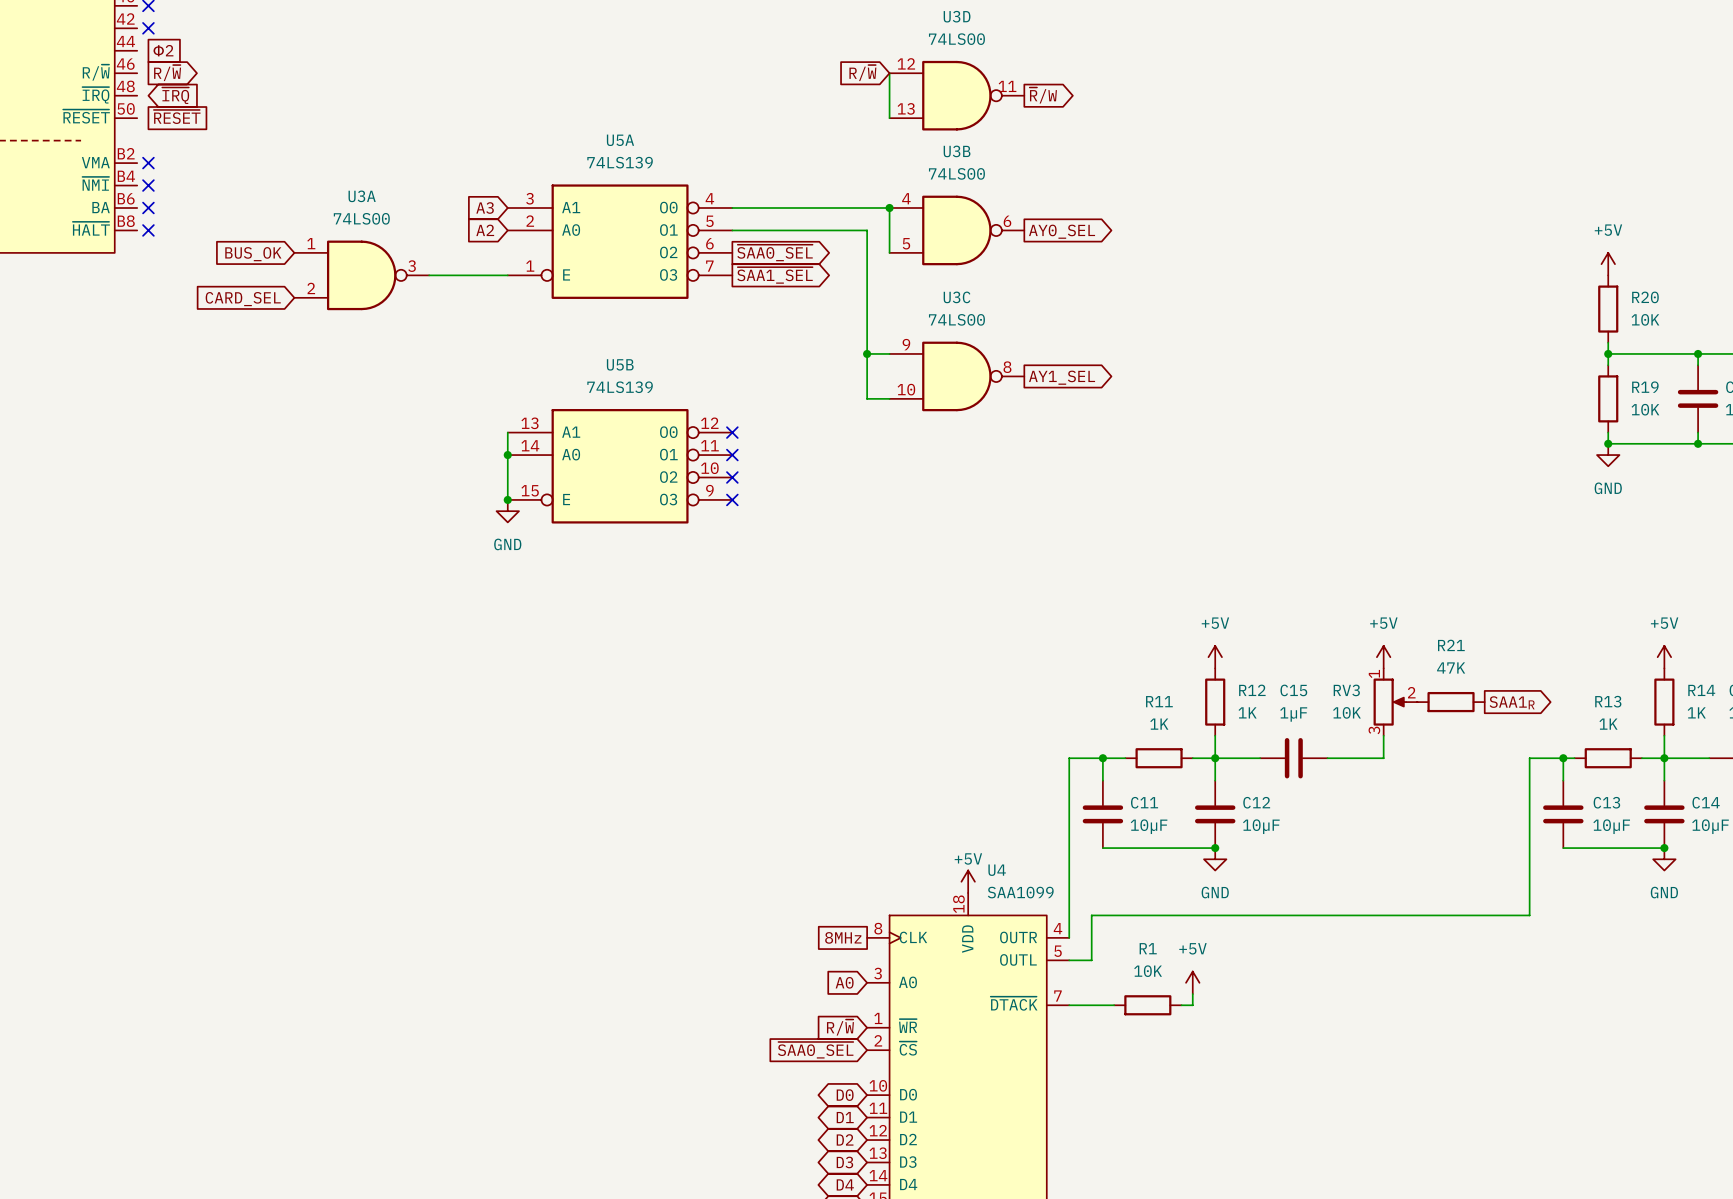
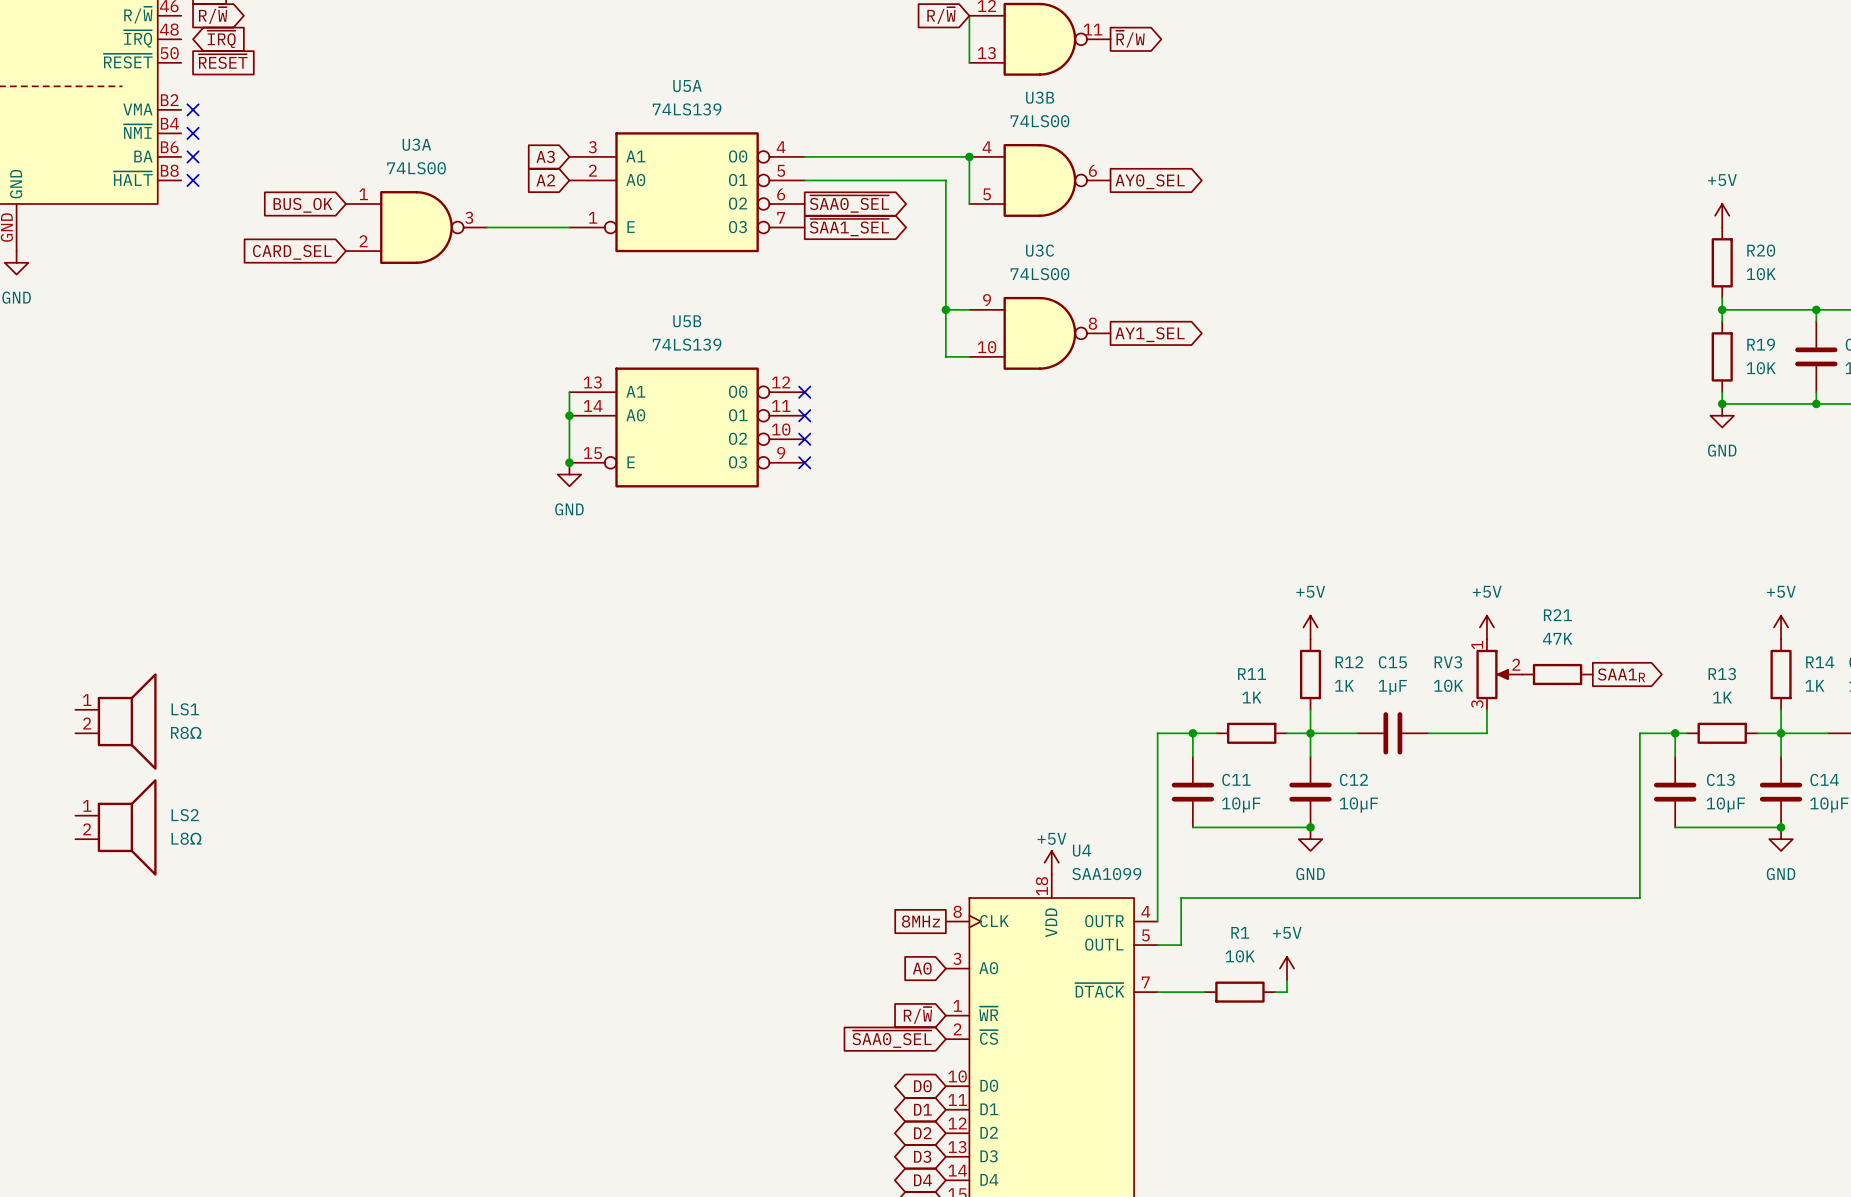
LS1: none -> R8Ω (115, 721)
LS2: none -> L8Ω (115, 827)

